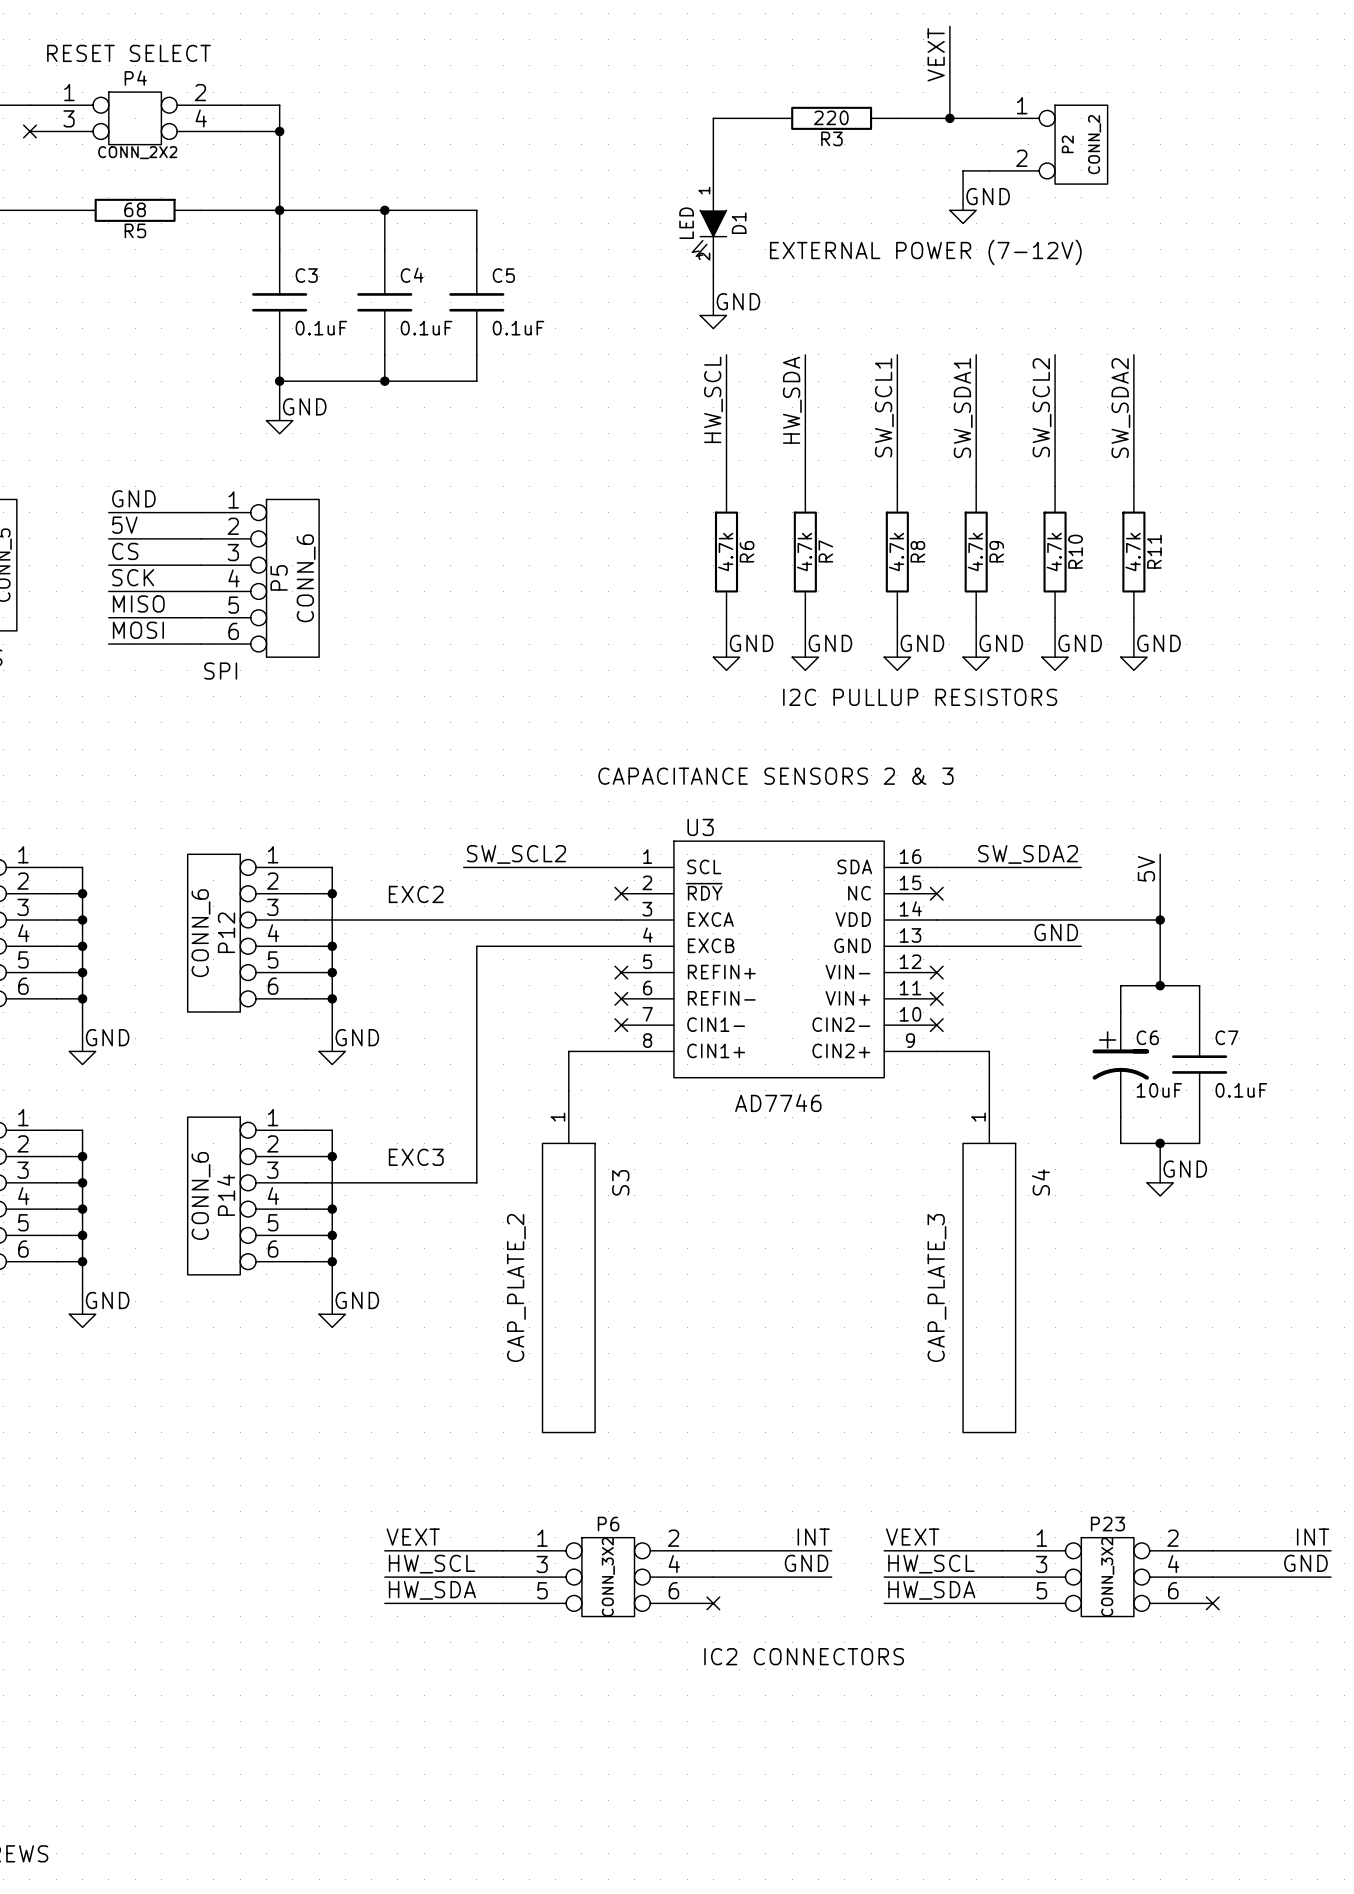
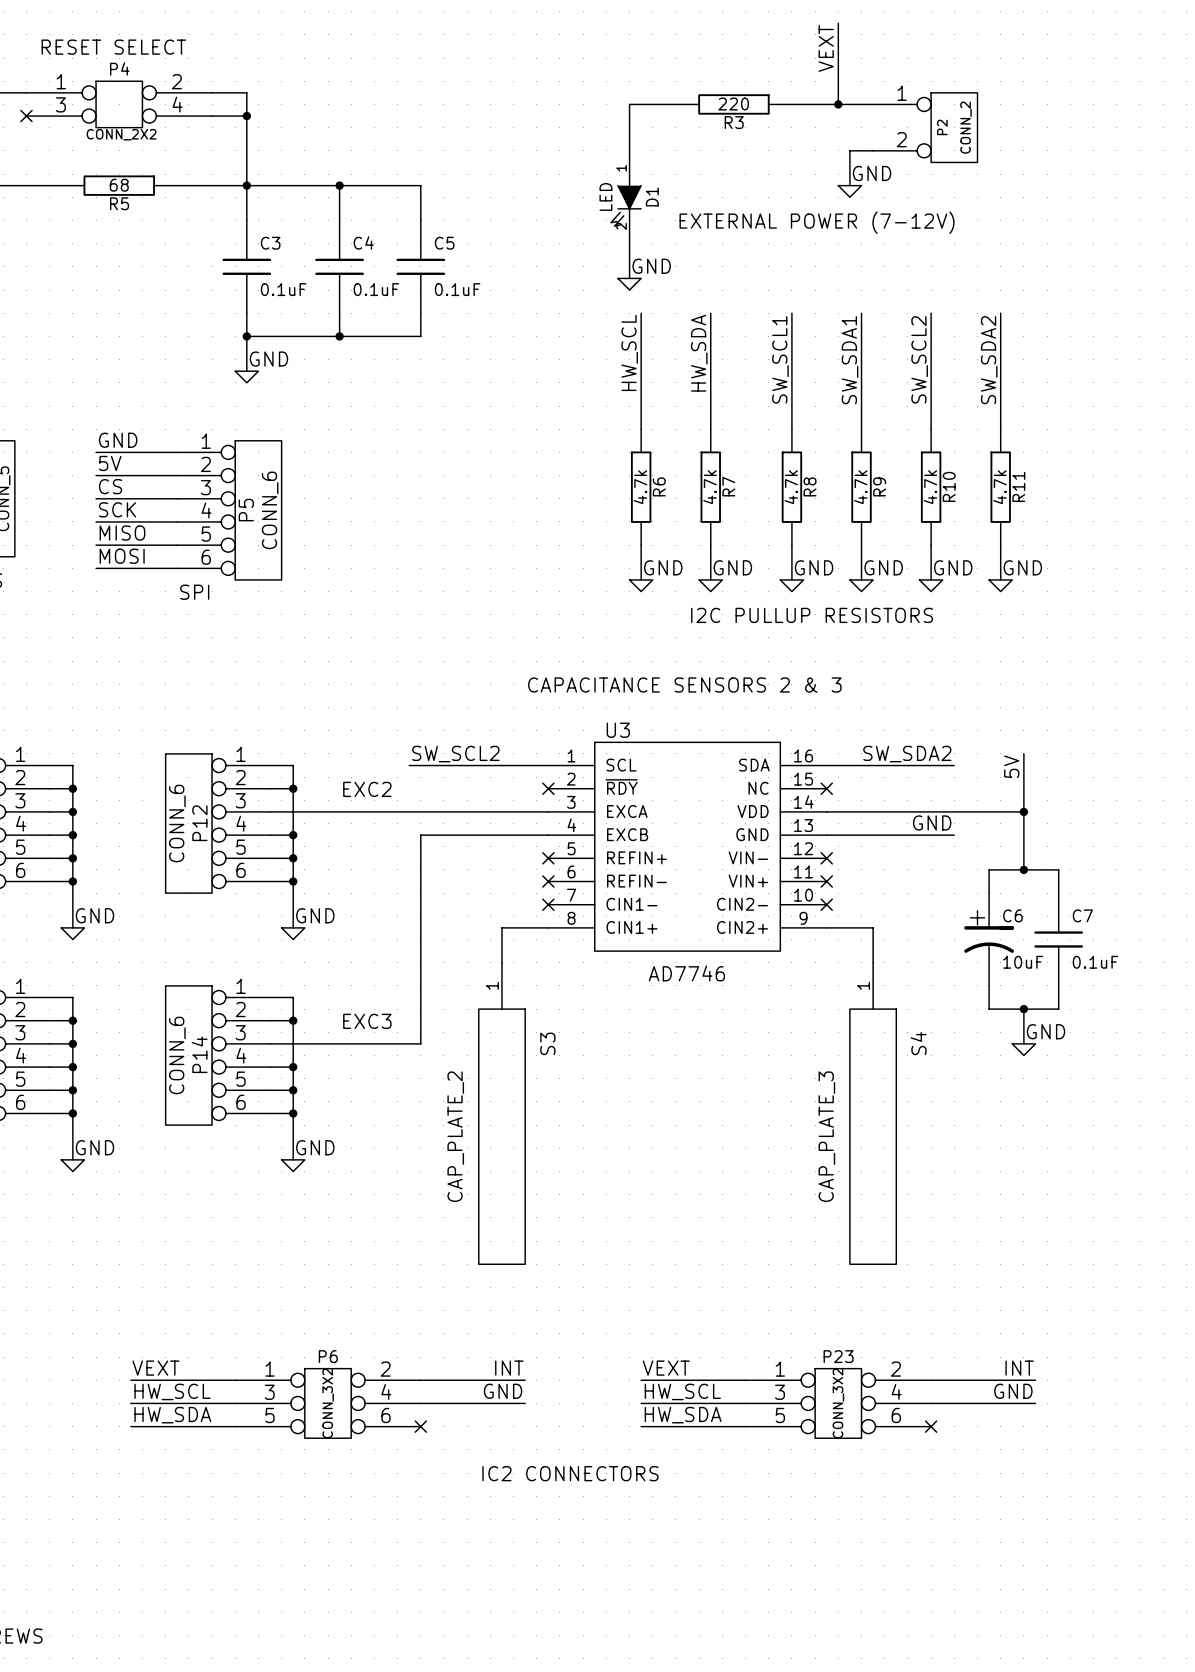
label: VEXT (413, 1537) -> none
label: INT (813, 1537) -> none
label position: VEXT (912, 1537) -> VEXT (666, 1368)
label position: INT (1313, 1537) -> INT (1019, 1368)
label: none -> VEXT (155, 1368)
wire: (384, 1550) (503, 1550) -> (130, 1380) (235, 1380)
label: none -> INT (509, 1368)
wire: (713, 1550) (831, 1550) -> (420, 1380) (525, 1380)
wire: (884, 1550) (1002, 1550) -> (641, 1380) (745, 1380)
wire: (1212, 1550) (1331, 1550) -> (931, 1380) (1035, 1380)
label: GND (806, 1563) -> none
label position: GND (1305, 1563) -> GND (1013, 1391)
label: HW_SCL (432, 1564) -> none
label position: HW_SCL (931, 1564) -> HW_SCL (682, 1391)
label: none -> GND (503, 1391)
label: none -> HW_SCL (172, 1391)
wire: (384, 1577) (503, 1577) -> (130, 1403) (235, 1403)
P6 position: (608, 1577) -> (328, 1403)
wire: (713, 1577) (831, 1577) -> (420, 1403) (525, 1403)
wire: (884, 1577) (1002, 1577) -> (641, 1403) (745, 1403)
P23 position: (1107, 1577) -> (838, 1403)
wire: (1212, 1577) (1331, 1577) -> (931, 1403) (1035, 1403)
label: HW_SDA (432, 1590) -> none
label position: HW_SDA (931, 1590) -> HW_SDA (683, 1415)
label: none -> HW_SDA (172, 1415)
wire: (384, 1603) (503, 1603) -> (130, 1426) (235, 1426)
no-connect mark: (713, 1603) -> none
wire: (884, 1603) (1002, 1603) -> (641, 1426) (745, 1426)
no-connect mark: (1212, 1603) -> none
no-connect mark: none -> (420, 1426)
no-connect mark: none -> (931, 1426)
text position: IC2 CONNECTORS (804, 1656) -> IC2 CONNECTORS (570, 1473)

